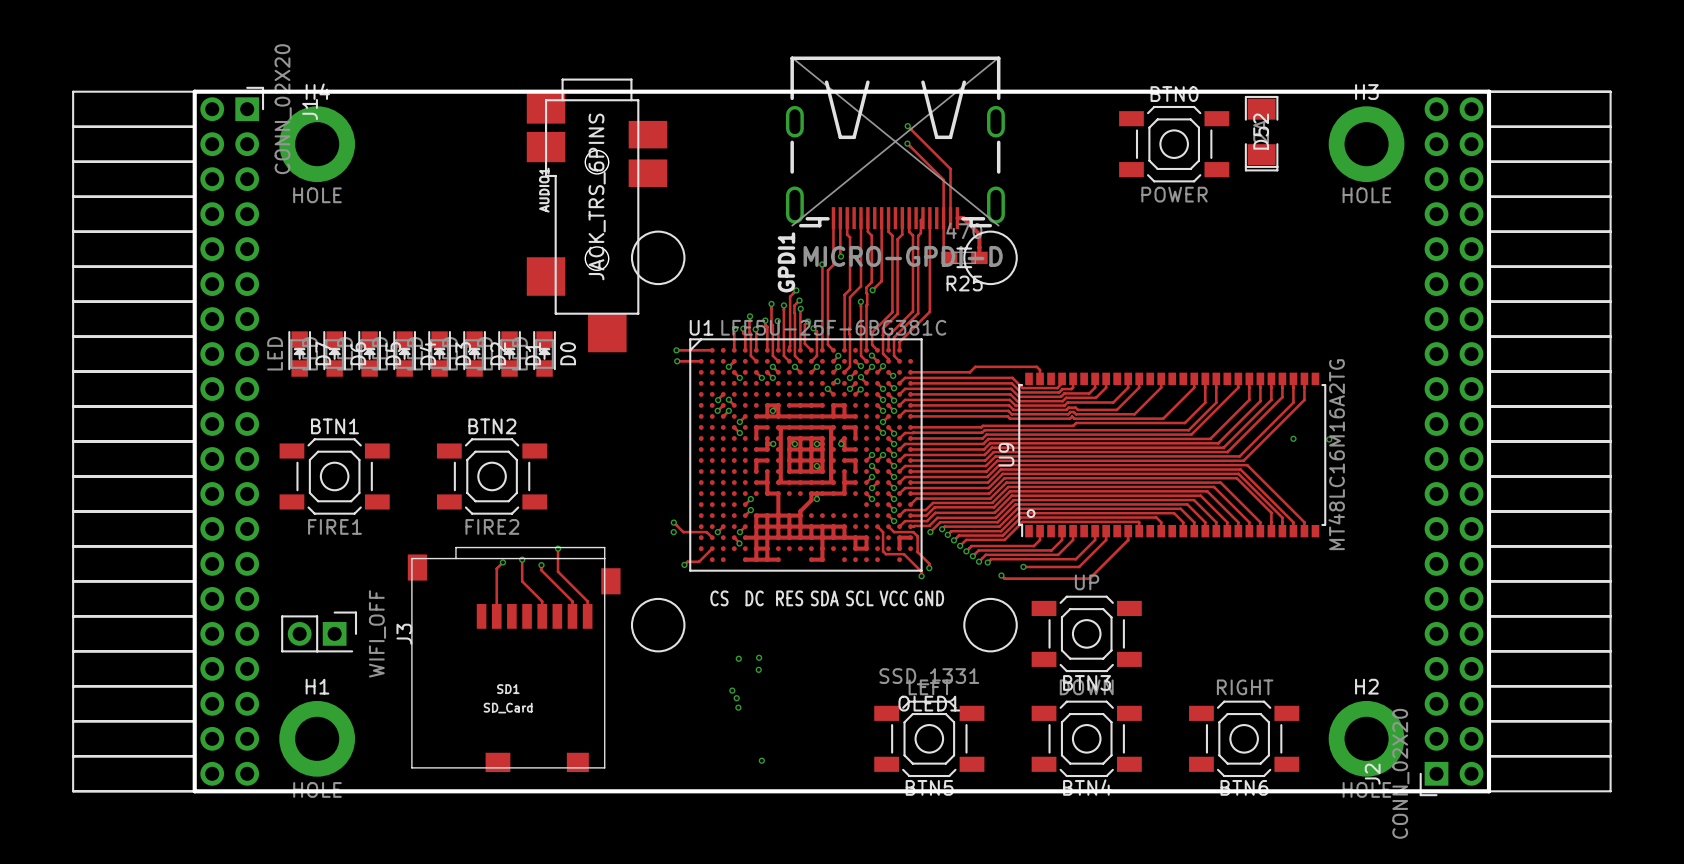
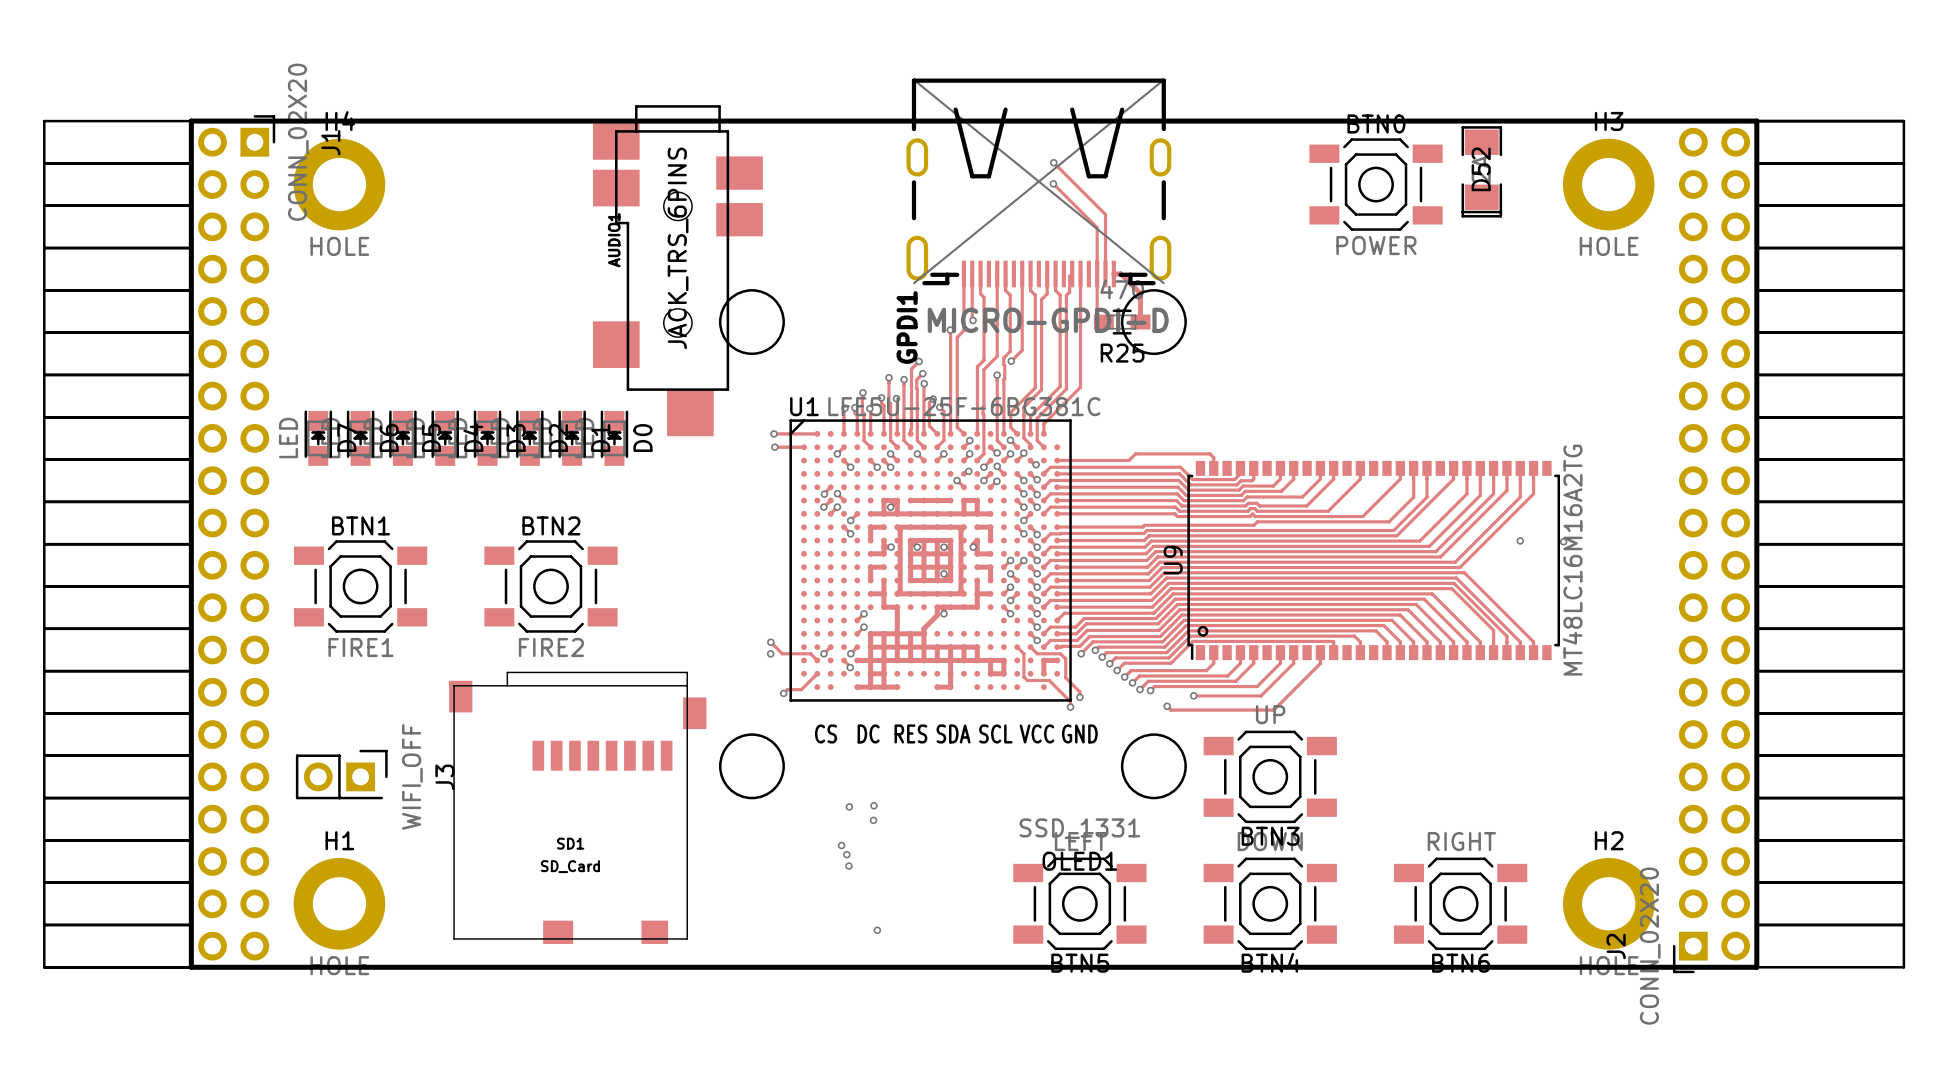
track: (558, 548) (558, 571) (587, 601) (587, 616) -> none
via: (558, 548) -> none
track: (522, 559) (522, 581) (542, 601) (542, 616) -> none
via: (522, 559) -> none
track: (502, 562) (496, 568) (496, 616) -> none
via: (502, 562) -> none
track: (541, 565) (541, 570) (572, 601) (572, 616) -> none
via: (541, 565) -> none

